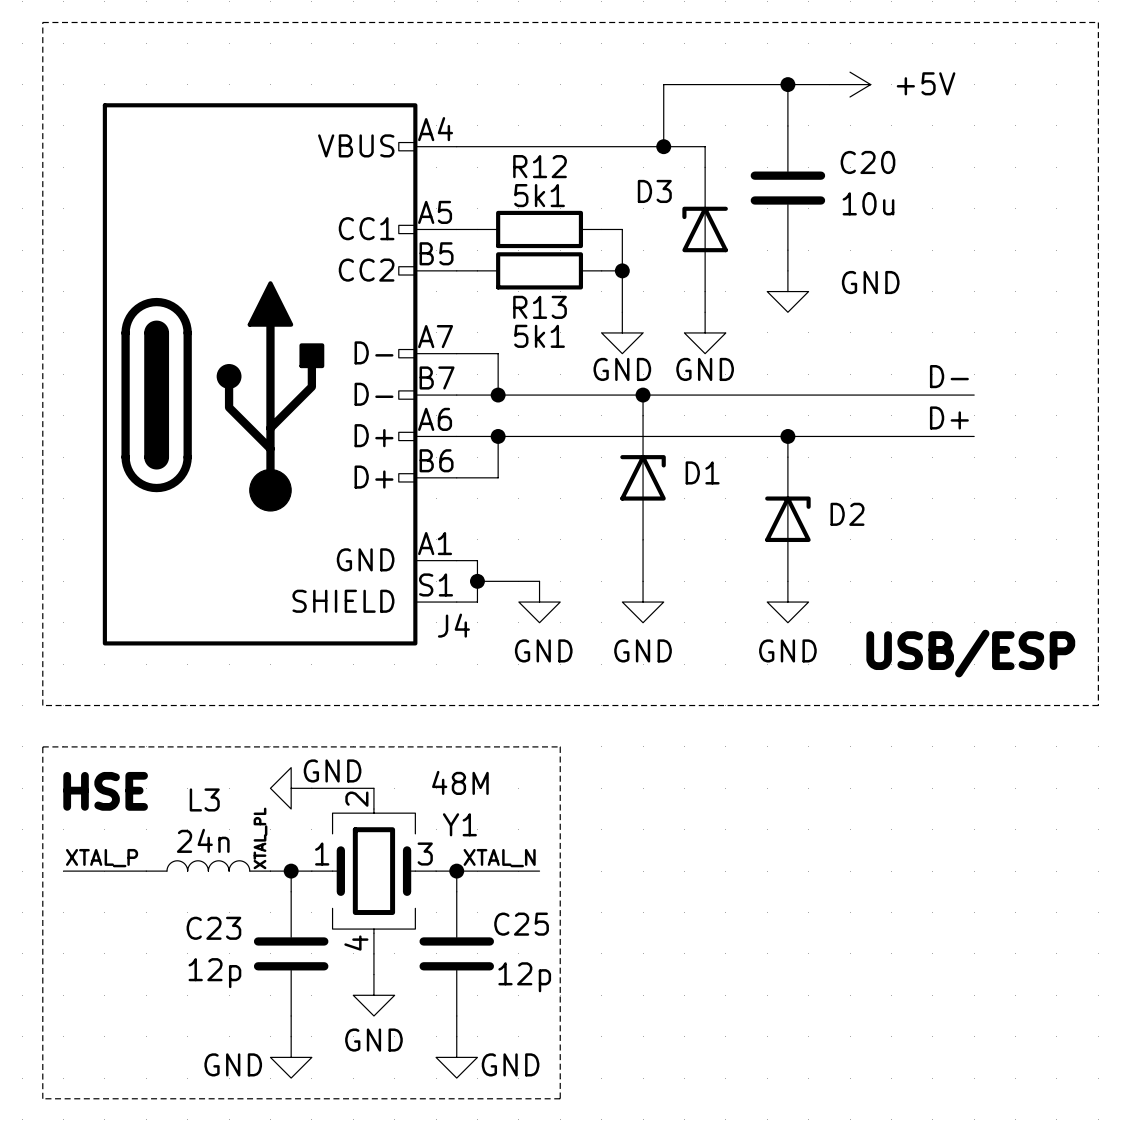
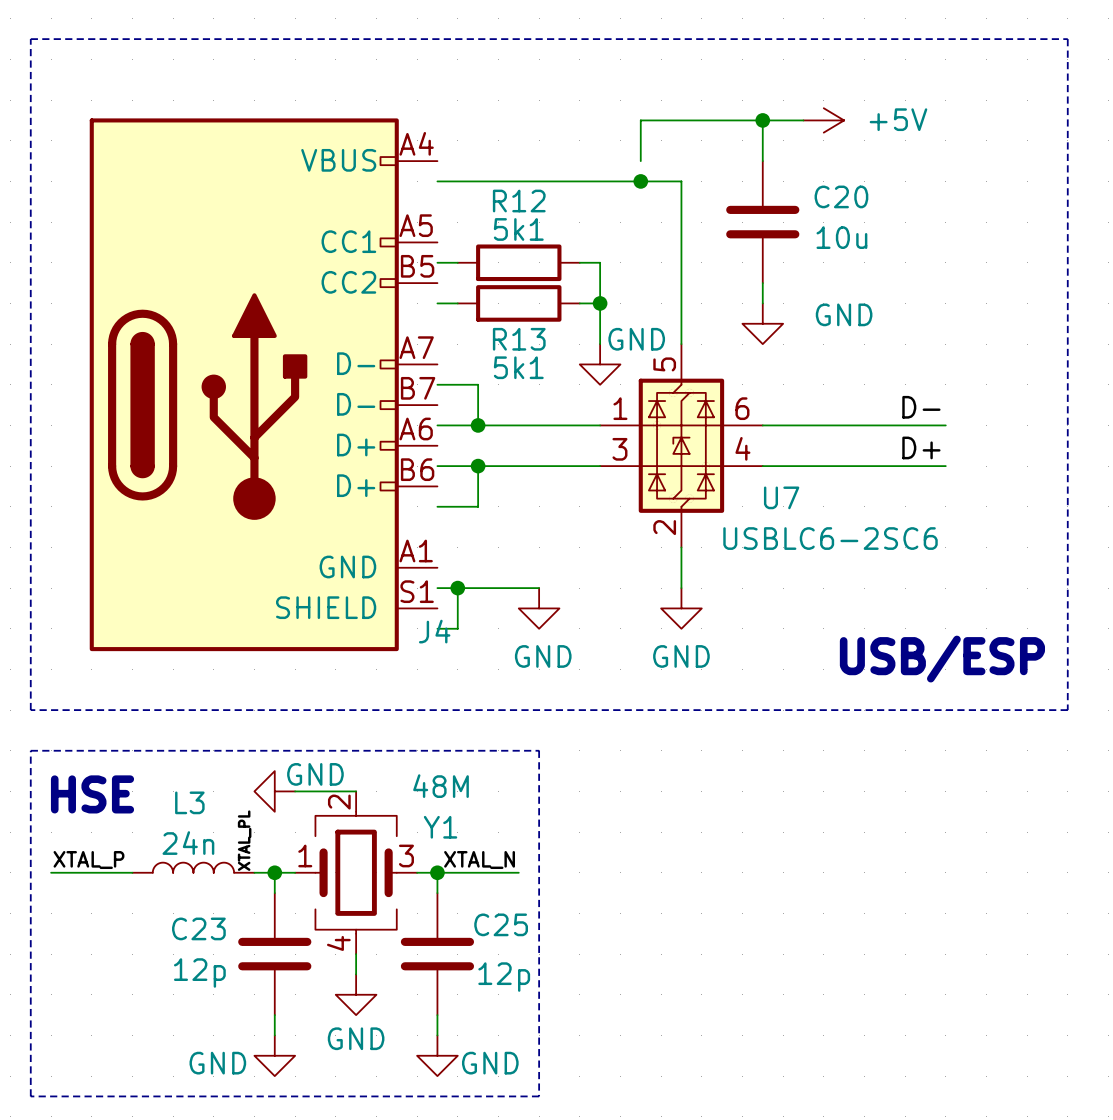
junction position: (787, 84) -> (762, 120)
wire: (829, 84) (663, 84) (663, 105) -> (803, 120) (640, 120)
power symbol position: +5V (850, 84) -> +5V (823, 120)
wire: (456, 146) (705, 146) (705, 167) -> none
junction position: (663, 146) -> (640, 181)
wire: none -> (437, 181) (681, 181) (681, 303)
C20 position: (787, 188) -> (762, 222)
wire: (456, 229) (477, 229) -> (437, 262) (457, 262)
R12 position: (539, 229) -> (518, 262)
wire: (601, 229) (622, 229) (622, 250) -> (579, 262) (600, 262)
D3: (705, 229) -> none
wire: (456, 270) (477, 270) -> (437, 303) (457, 303)
R13 position: (539, 270) -> (518, 303)
wire: (601, 270) (622, 270) -> (579, 303) (600, 303)
junction position: (622, 270) -> (600, 303)
power symbol position: GND (787, 291) -> GND (762, 323)
power symbol position: GND (622, 332) -> GND (600, 364)
power symbol: GND (705, 332) -> none
wire: (456, 353) (498, 353) (498, 374) -> (437, 384) (478, 384)
power symbol text position: GND (622, 369) -> GND (636, 339)
label position: D- (949, 376) -> D- (921, 407)
wire: (456, 395) (974, 395) -> none
junction: (498, 395) -> none
junction: (643, 395) -> none
wire: none -> (437, 425) (600, 425)
junction: none -> (478, 425)
wire: none -> (762, 425) (945, 425)
label position: D+ (949, 417) -> D+ (921, 447)
wire: (456, 436) (974, 436) -> none
wire: (498, 436) (498, 457) -> (478, 405) (478, 425)
junction: (498, 436) -> none
U7: none -> USBLC6-2SC6 (681, 445)
wire: (787, 436) (787, 457) -> (945, 466) (762, 466)
junction: (787, 436) -> none
wire: none -> (437, 466) (600, 466)
junction: none -> (478, 466)
wire: (456, 477) (498, 477) -> (437, 506) (478, 506) (478, 486)
D1: (643, 477) -> none
D2: (787, 519) -> none
wire: (643, 539) (643, 581) -> (681, 547) (681, 588)
wire: (456, 560) (477, 560) (477, 581) -> (437, 588) (457, 588)
wire: none -> (518, 588) (539, 588)
wire: (456, 602) (477, 602) -> (437, 628) (457, 628) (457, 608)
power symbol position: GND (539, 602) -> GND (539, 608)
power symbol: GND (643, 602) -> none
power symbol: none -> GND (681, 608)
power symbol: GND (787, 602) -> none

